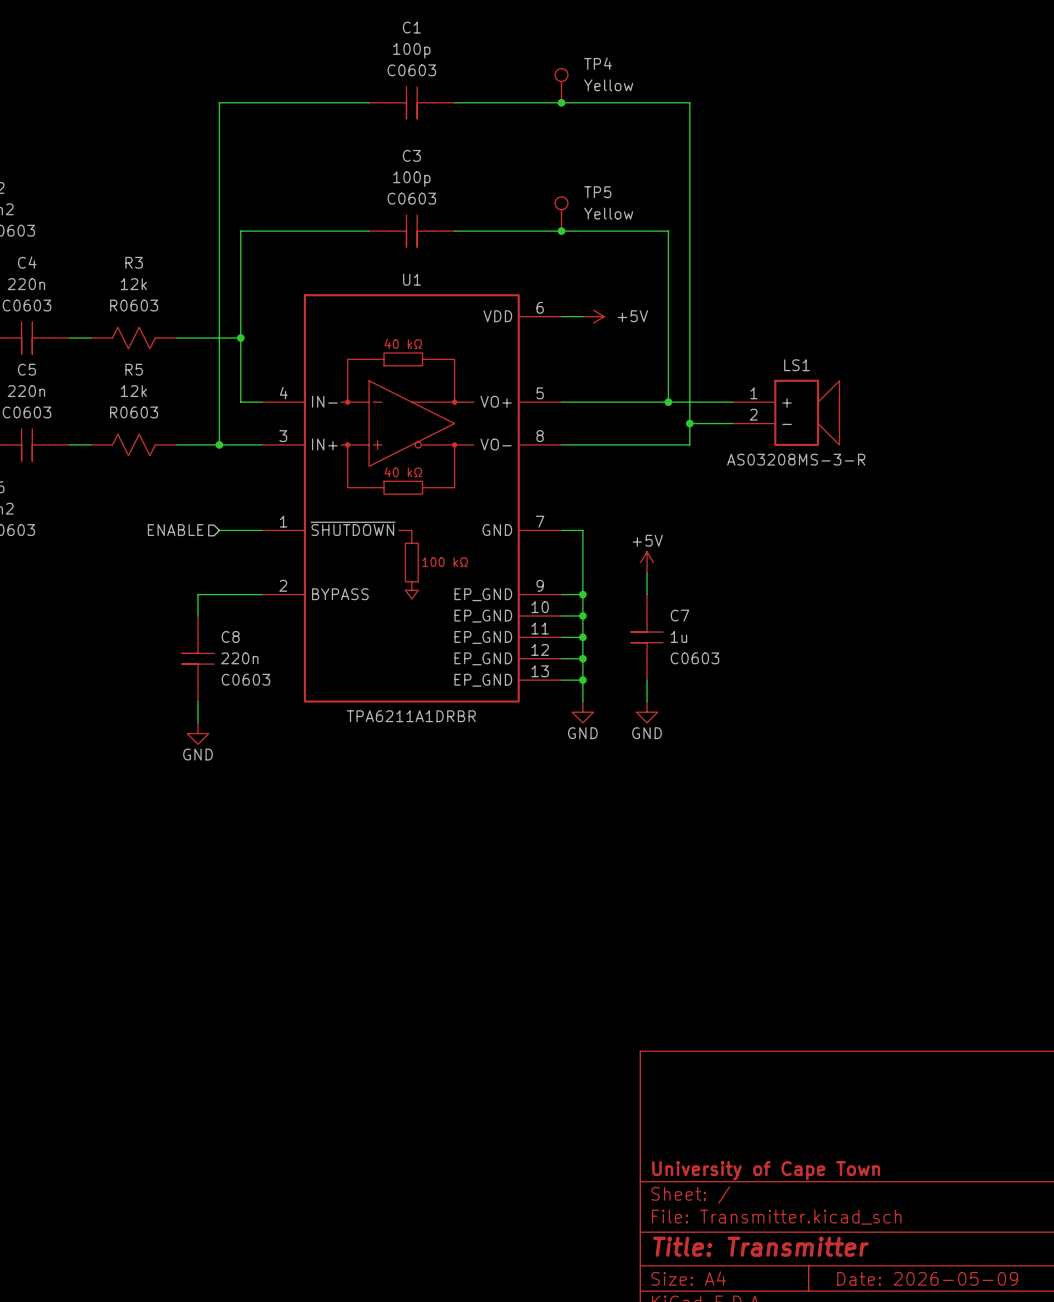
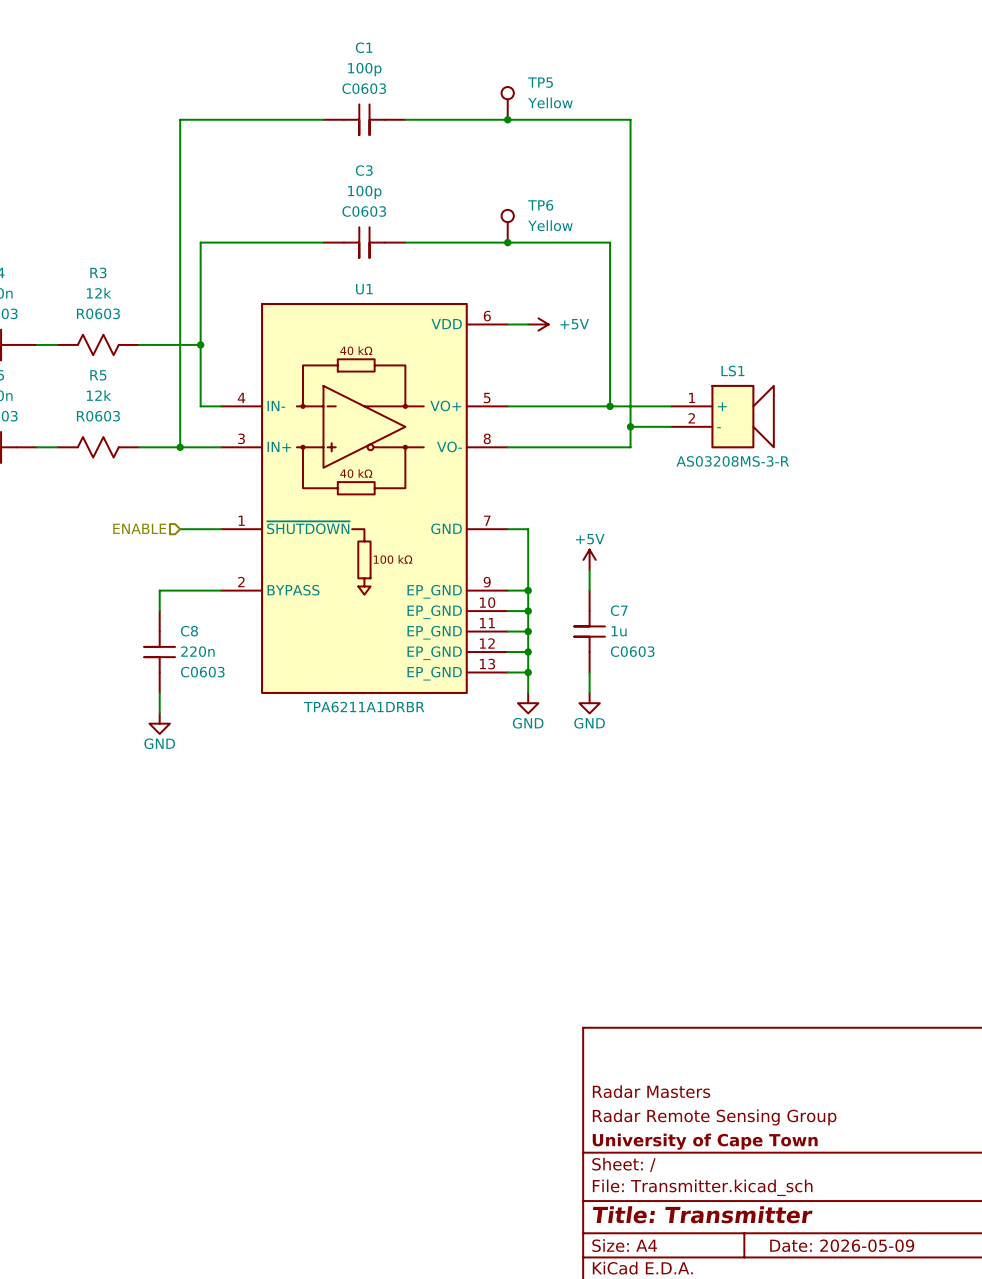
TP4 name: TP4 (597, 63) -> TP5 (540, 82)
TP5 name: TP5 (597, 192) -> TP6 (540, 205)
title block: none -> Radar Masters (651, 1091)
title block: none -> Radar Remote Sensing Group (714, 1117)

